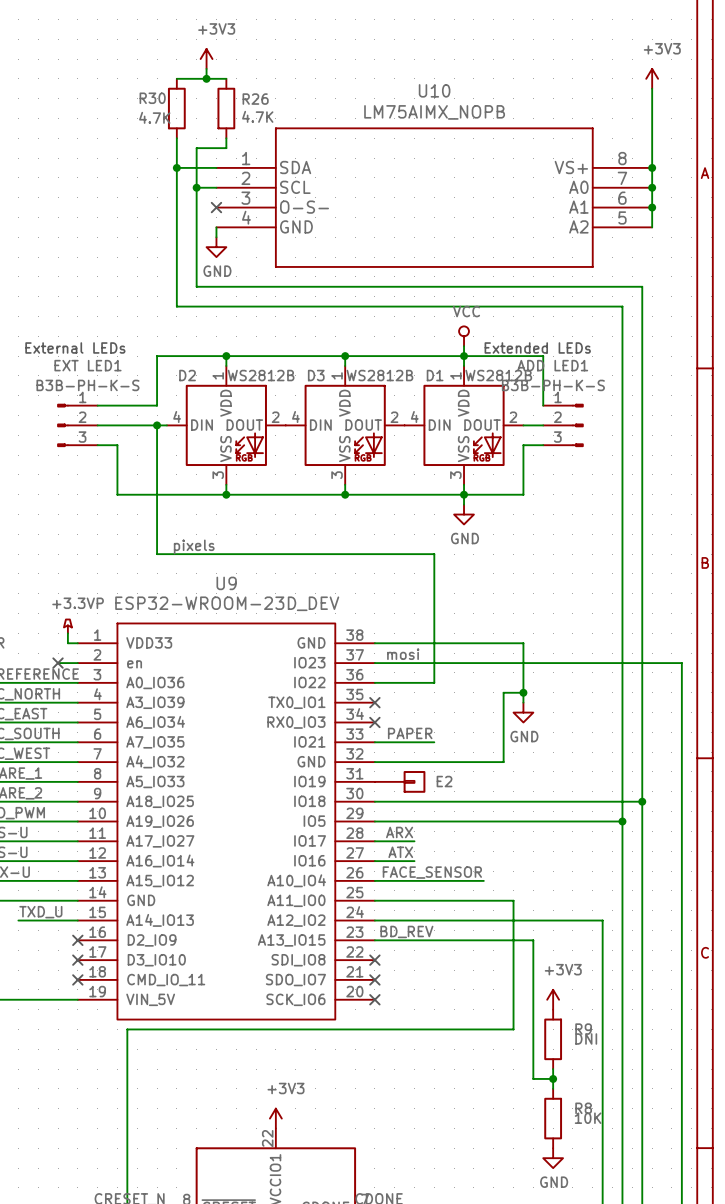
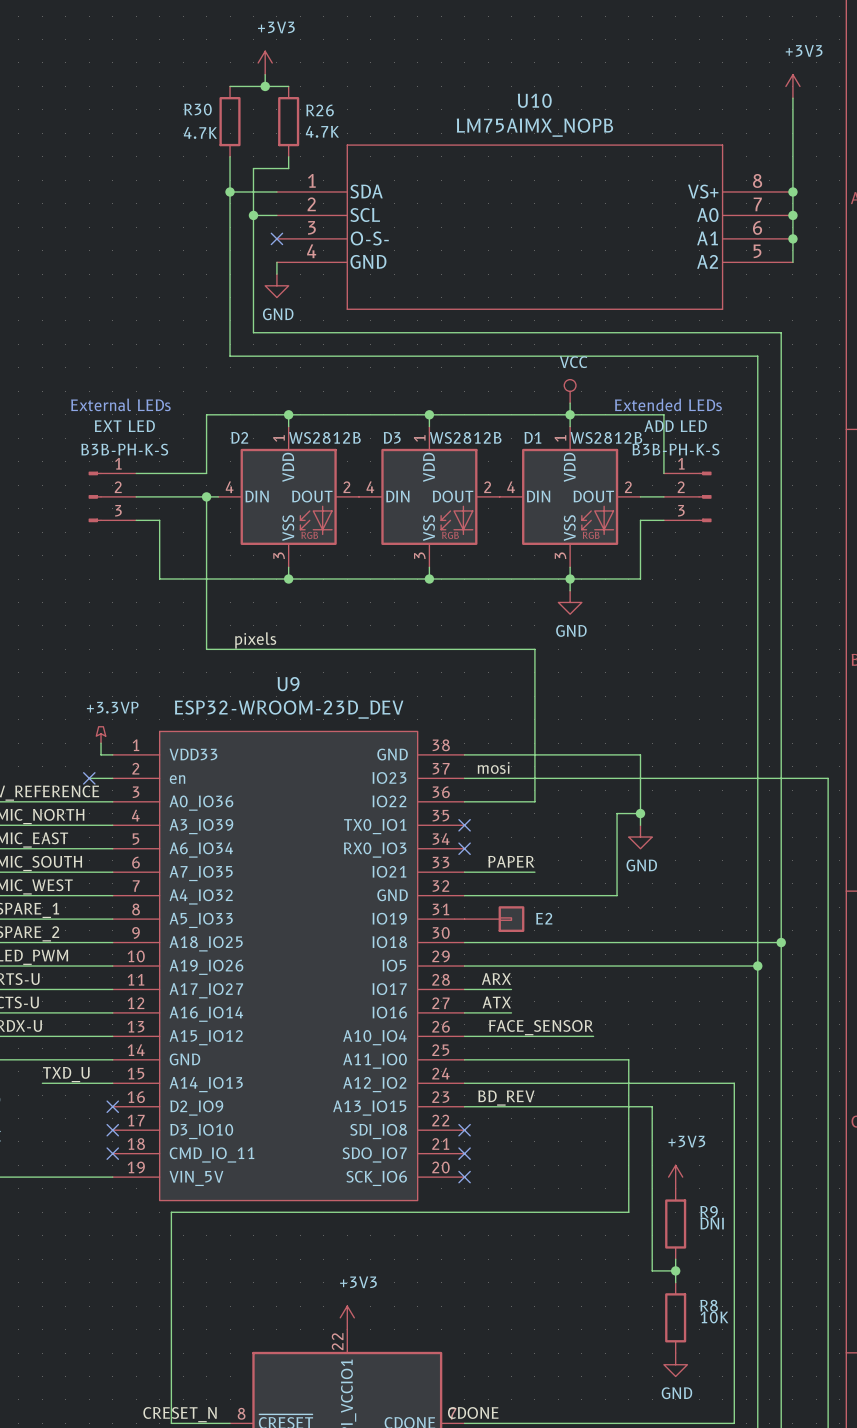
EXT LED1 name: EXT LED1 (87, 365) -> EXT LED (124, 426)
ADD LED1 name: ADD LED1 (552, 365) -> ADD LED (675, 426)

